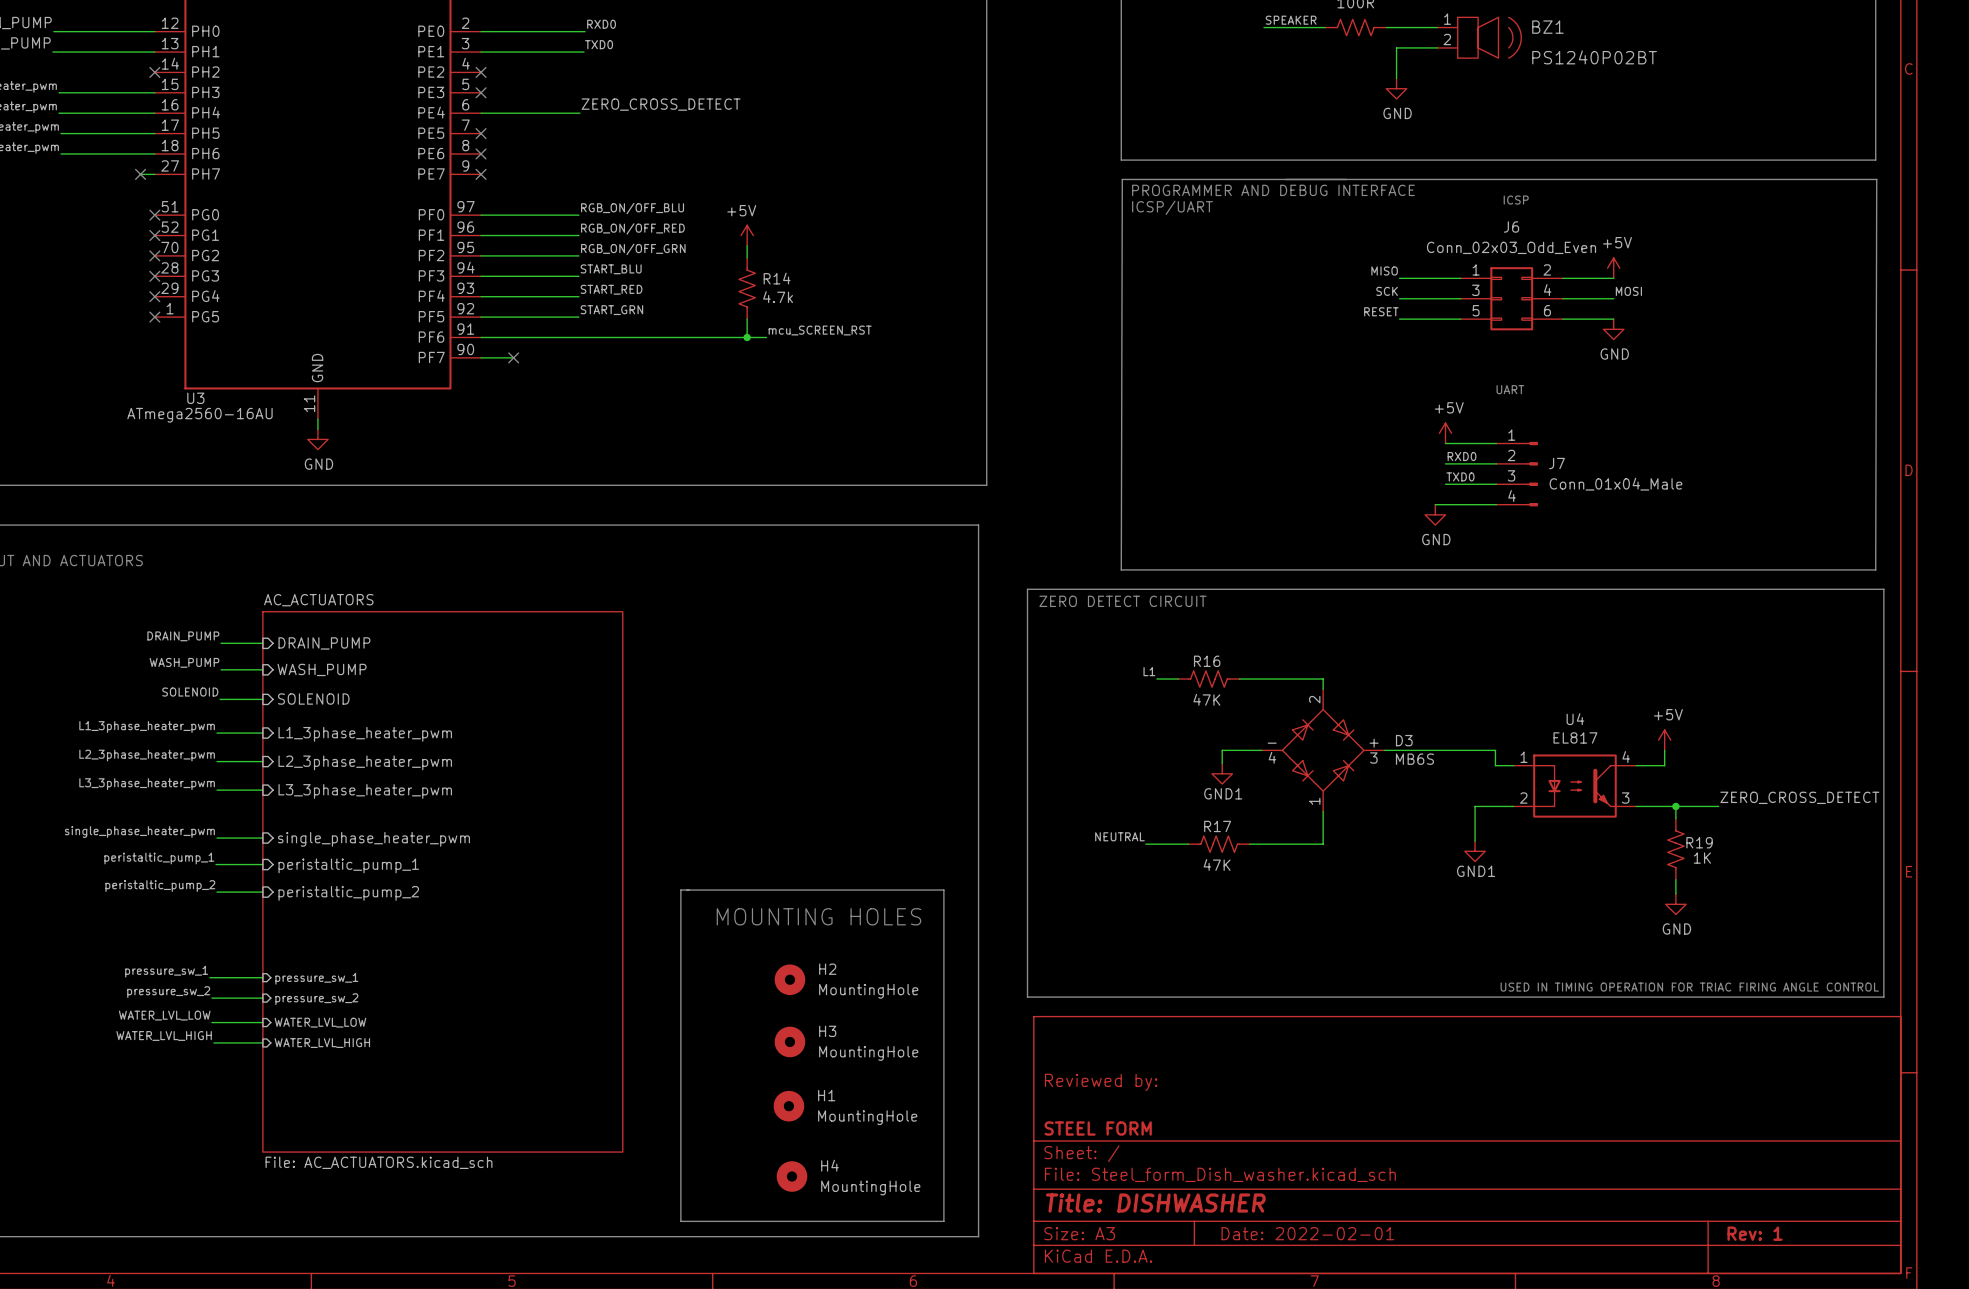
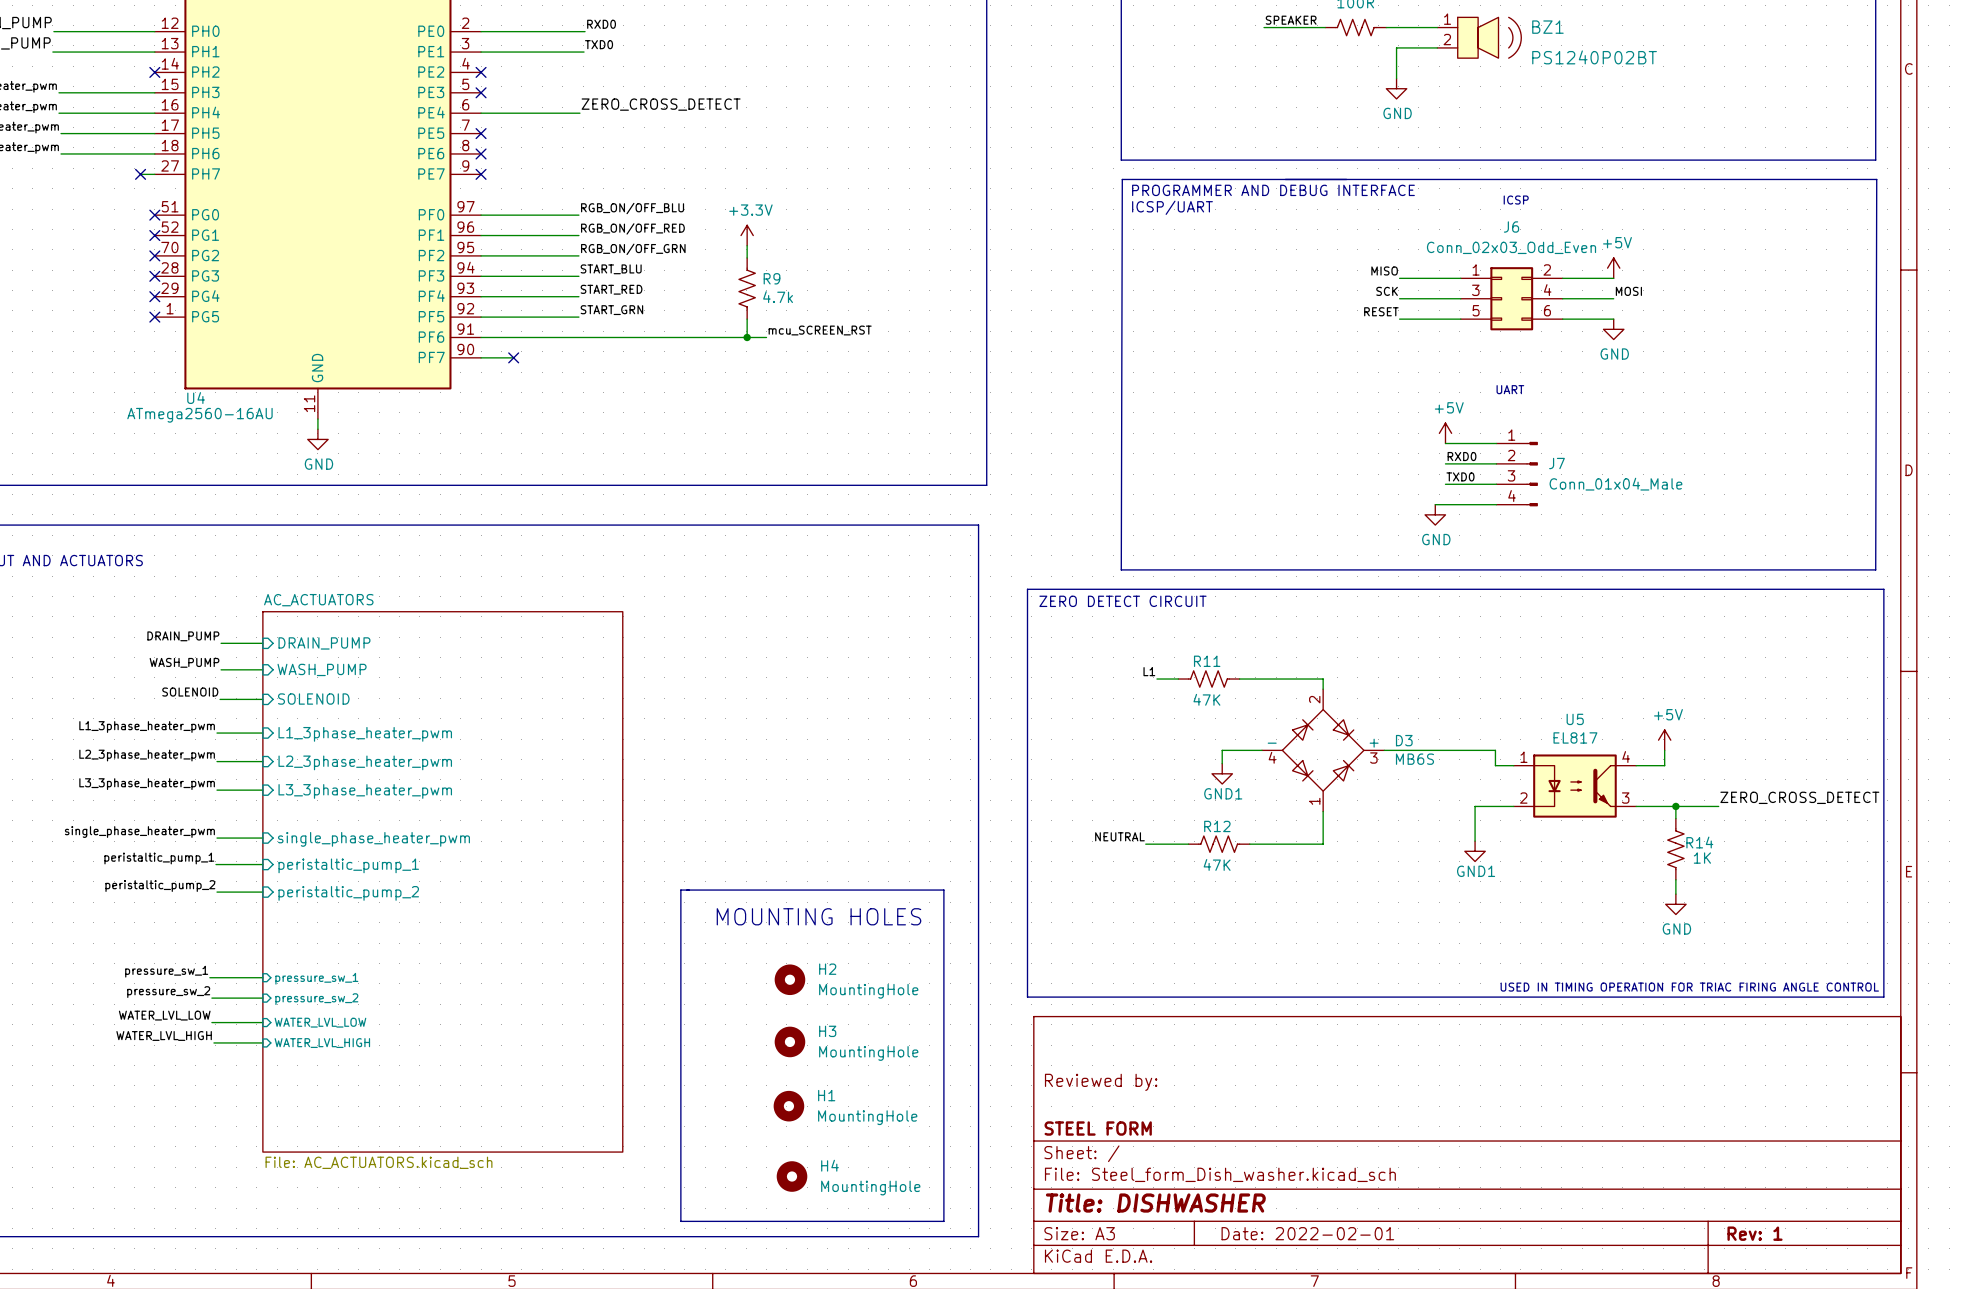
power symbol: +5V (747, 235) -> +3.3V (747, 235)
R14 name: R14 (777, 278) -> R9 (772, 278)
U3 name: U3 (195, 398) -> U4 (196, 398)
R16 name: R16 (1207, 661) -> R11 (1207, 661)
U4 name: U4 (1575, 719) -> U5 (1575, 719)
R17 name: R17 (1217, 826) -> R12 (1217, 826)
R19 name: R19 (1699, 842) -> R14 (1699, 842)

